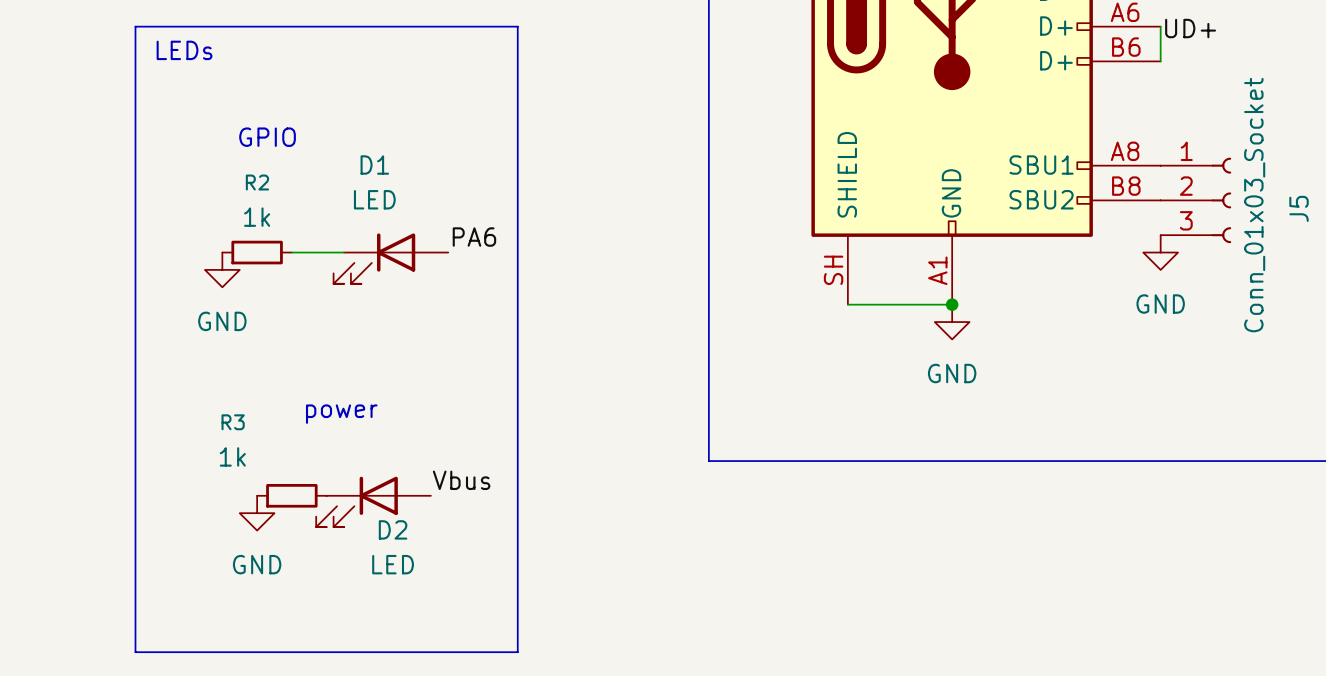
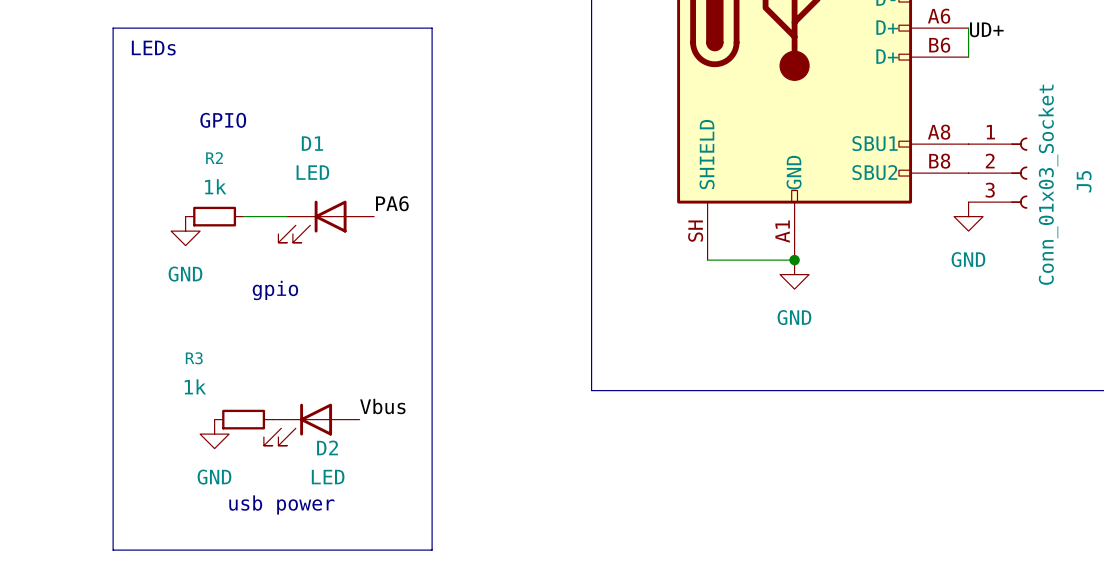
text: none -> gpio (275, 290)
text: power (341, 414) -> none
text: none -> usb power (281, 504)

